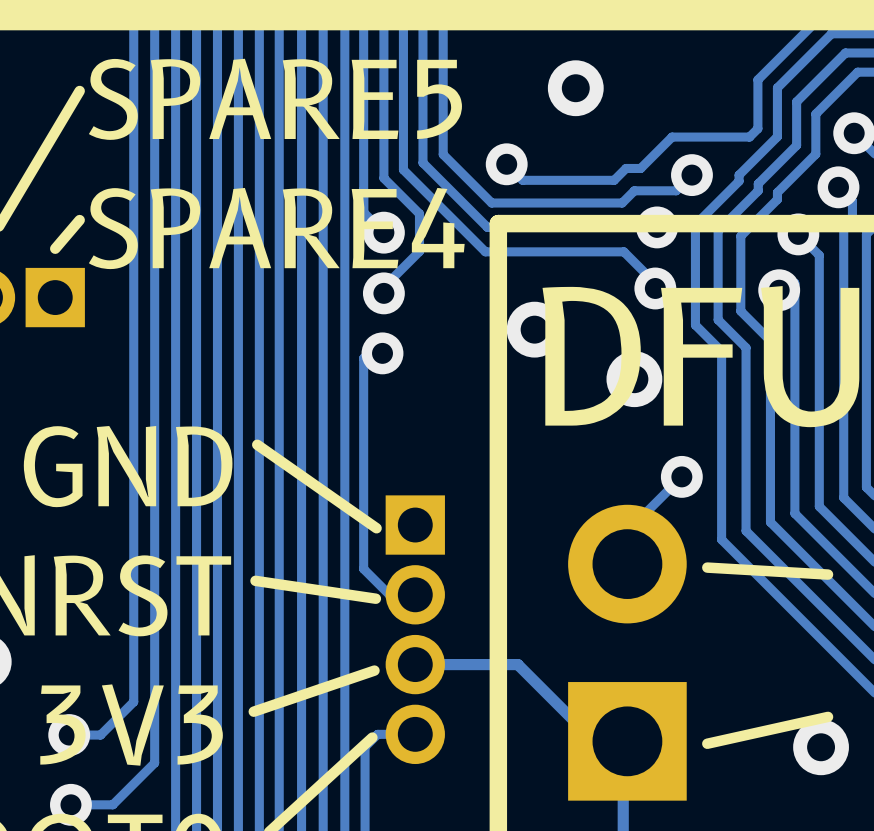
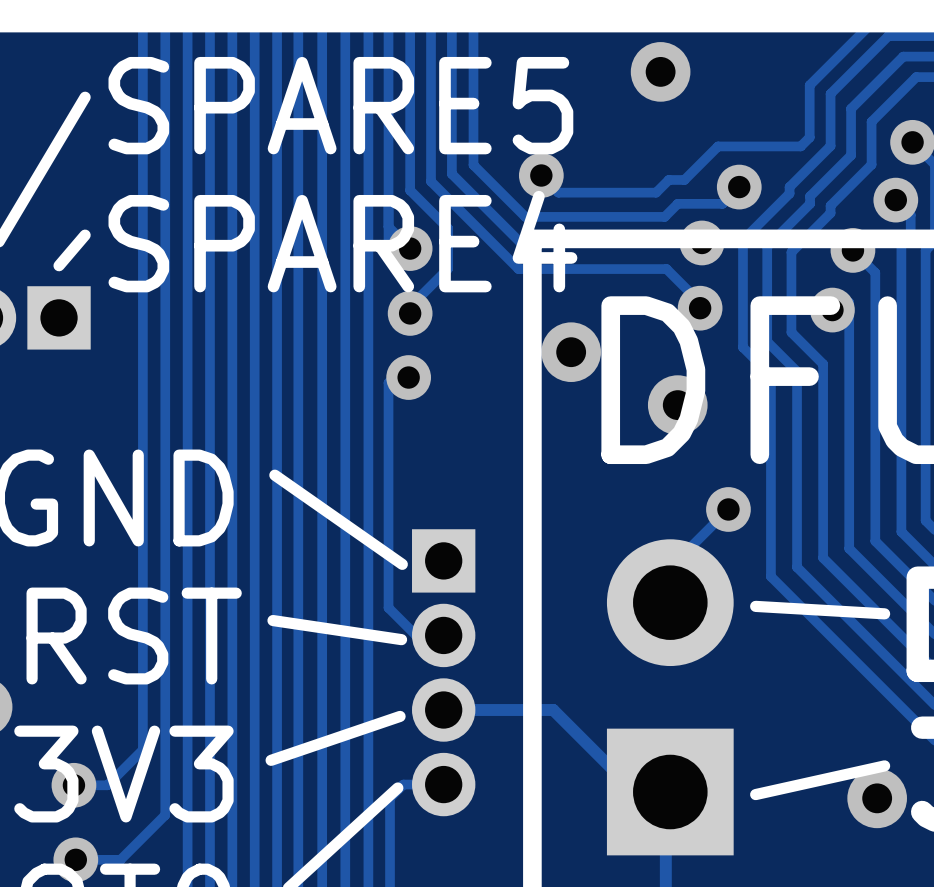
via position: (575, 88) -> (660, 71)

